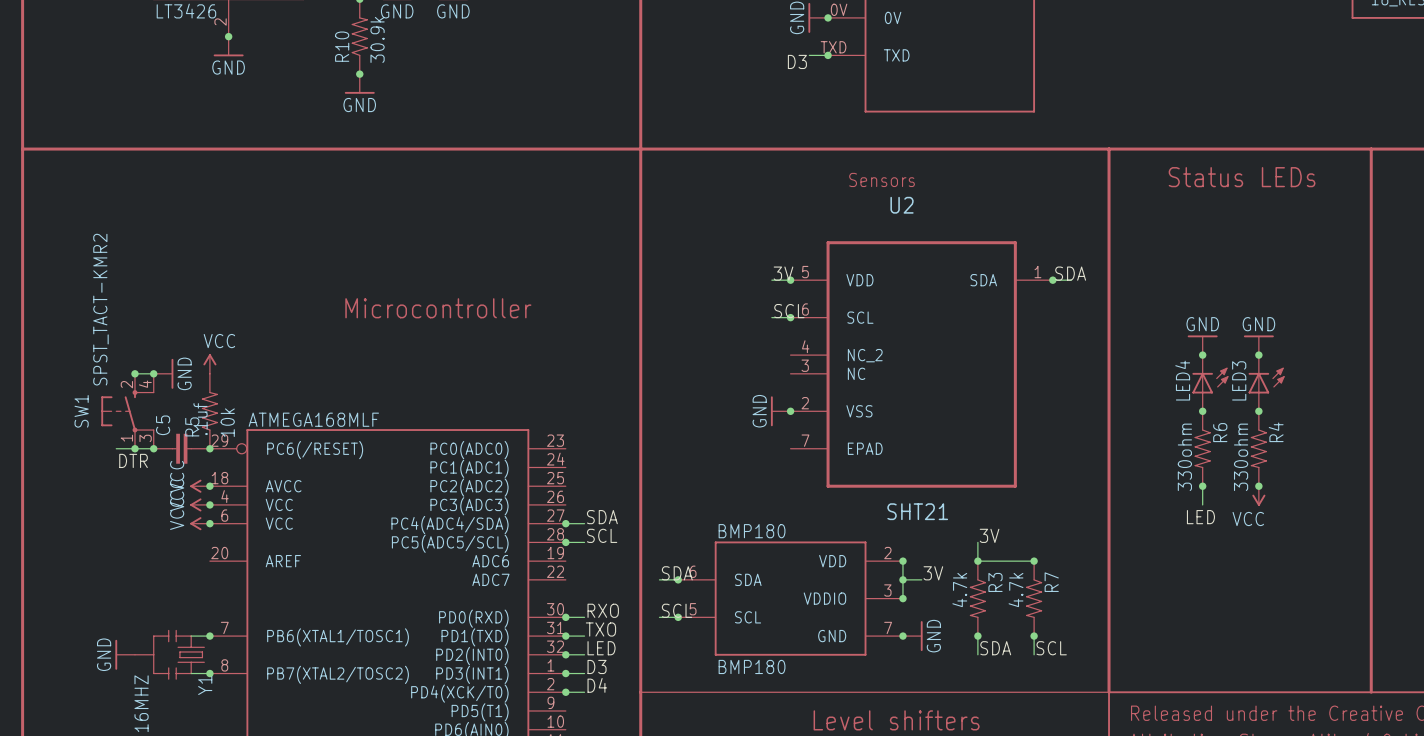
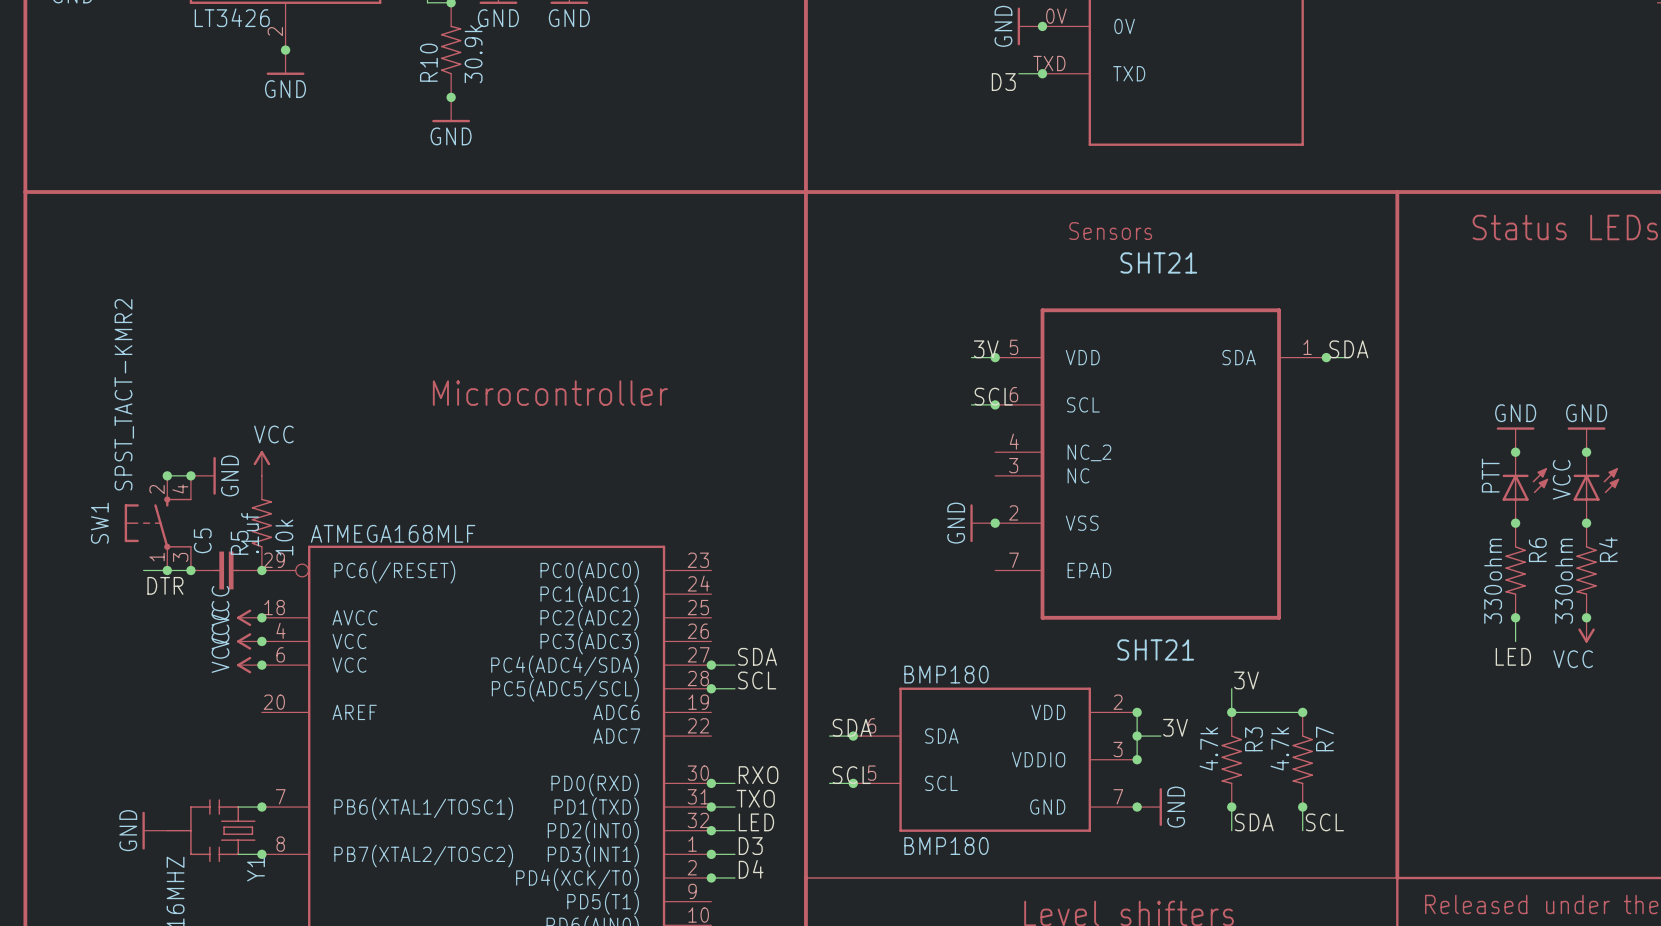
U2 name: U2 (902, 205) -> SHT21 (1158, 262)
LED4 name: LED4 (1182, 380) -> PTT (1490, 475)
LED3 name: LED3 (1239, 380) -> VCC (1561, 479)

